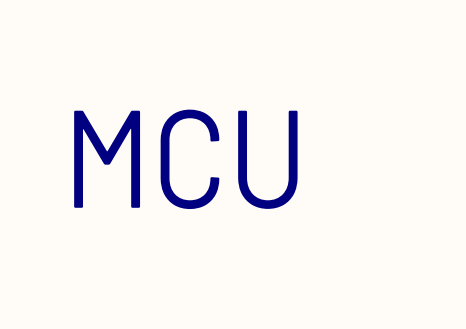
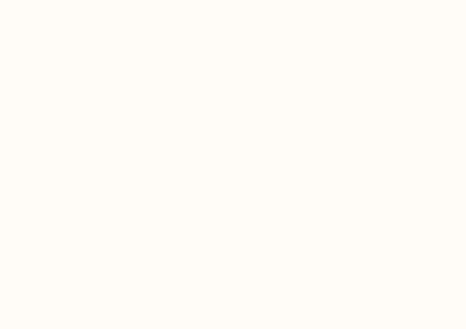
text: MCU (185, 159) -> none

